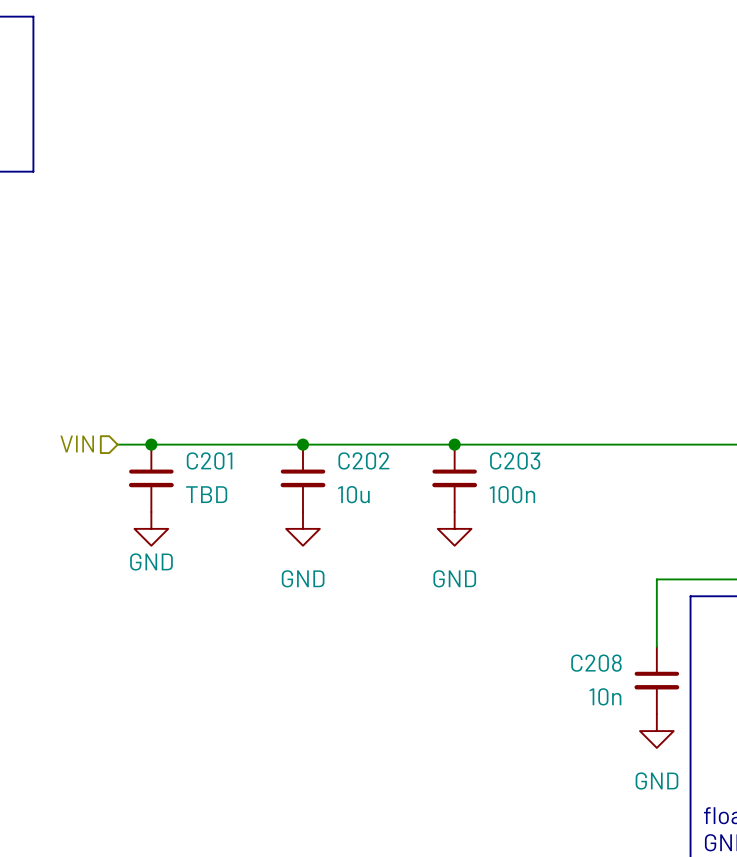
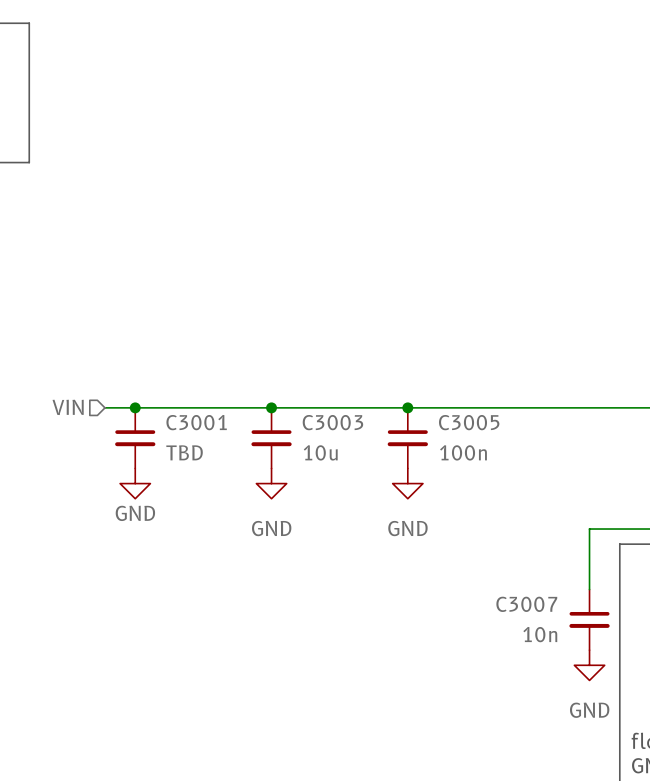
C201 name: C201 (209, 460) -> C3001 (196, 422)
C202 name: C202 (363, 460) -> C3003 (332, 422)
C203 name: C203 (515, 460) -> C3005 (469, 422)
C208 name: C208 (596, 663) -> C3007 (526, 604)

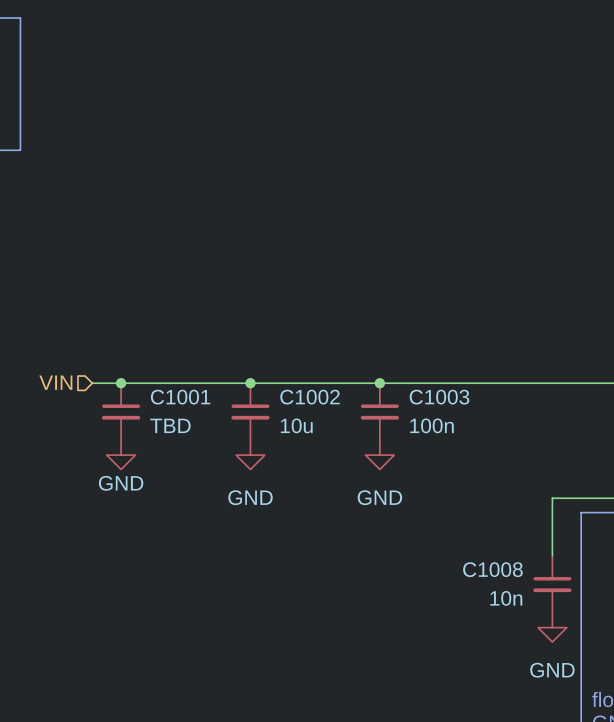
C3001 name: C3001 (196, 422) -> C1001 (180, 397)
C3003 name: C3003 (332, 422) -> C1002 (310, 397)
C3005 name: C3005 (469, 422) -> C1003 (439, 397)
C3007 name: C3007 (526, 604) -> C1008 (492, 569)

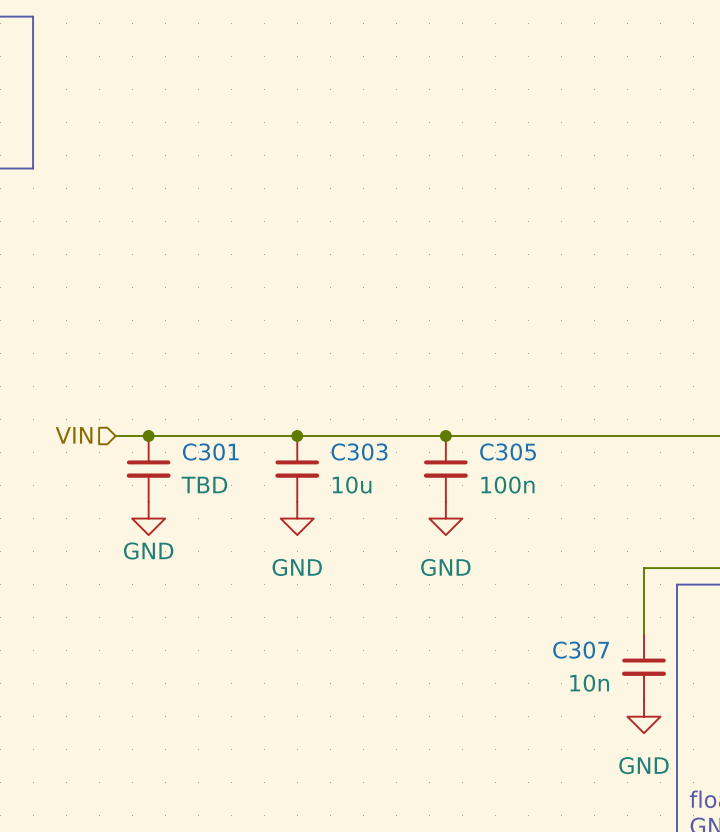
C1001 name: C1001 (180, 397) -> C301 (210, 451)
C1002 name: C1002 (310, 397) -> C303 (359, 451)
C1003 name: C1003 (439, 397) -> C305 (508, 451)
C1008 name: C1008 (492, 569) -> C307 (581, 650)

